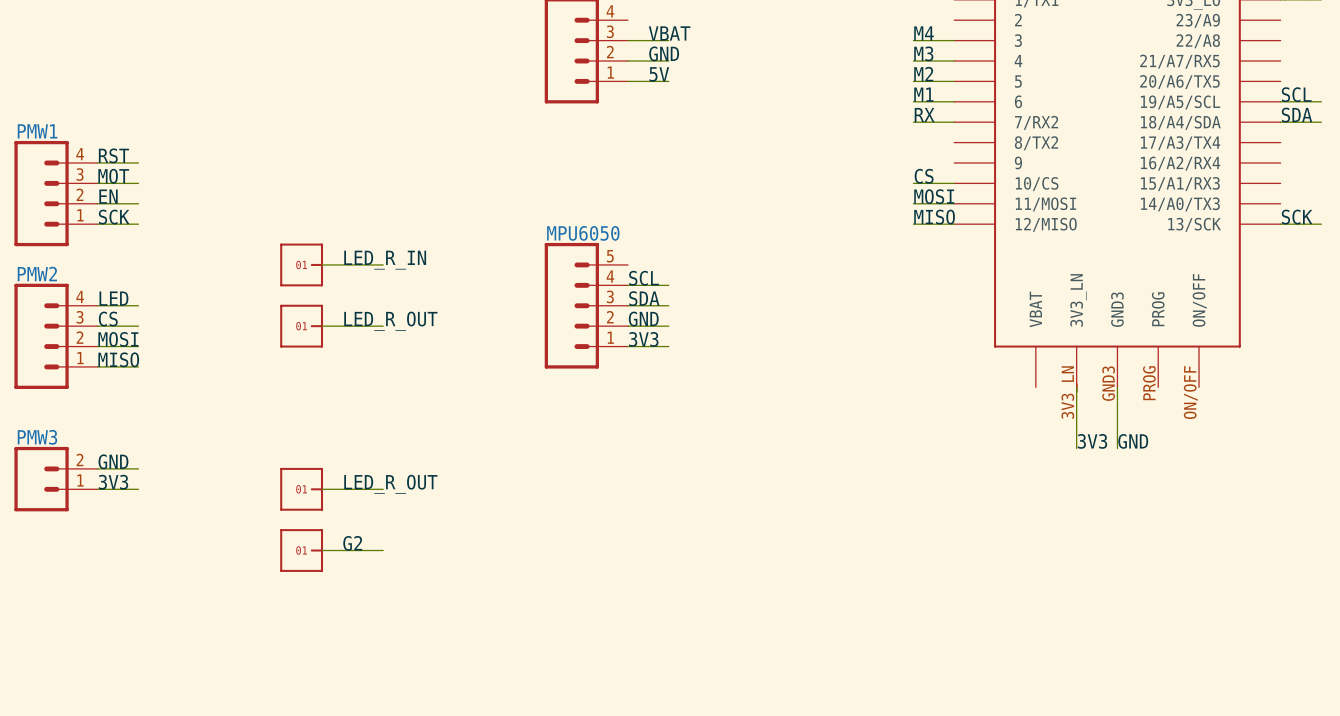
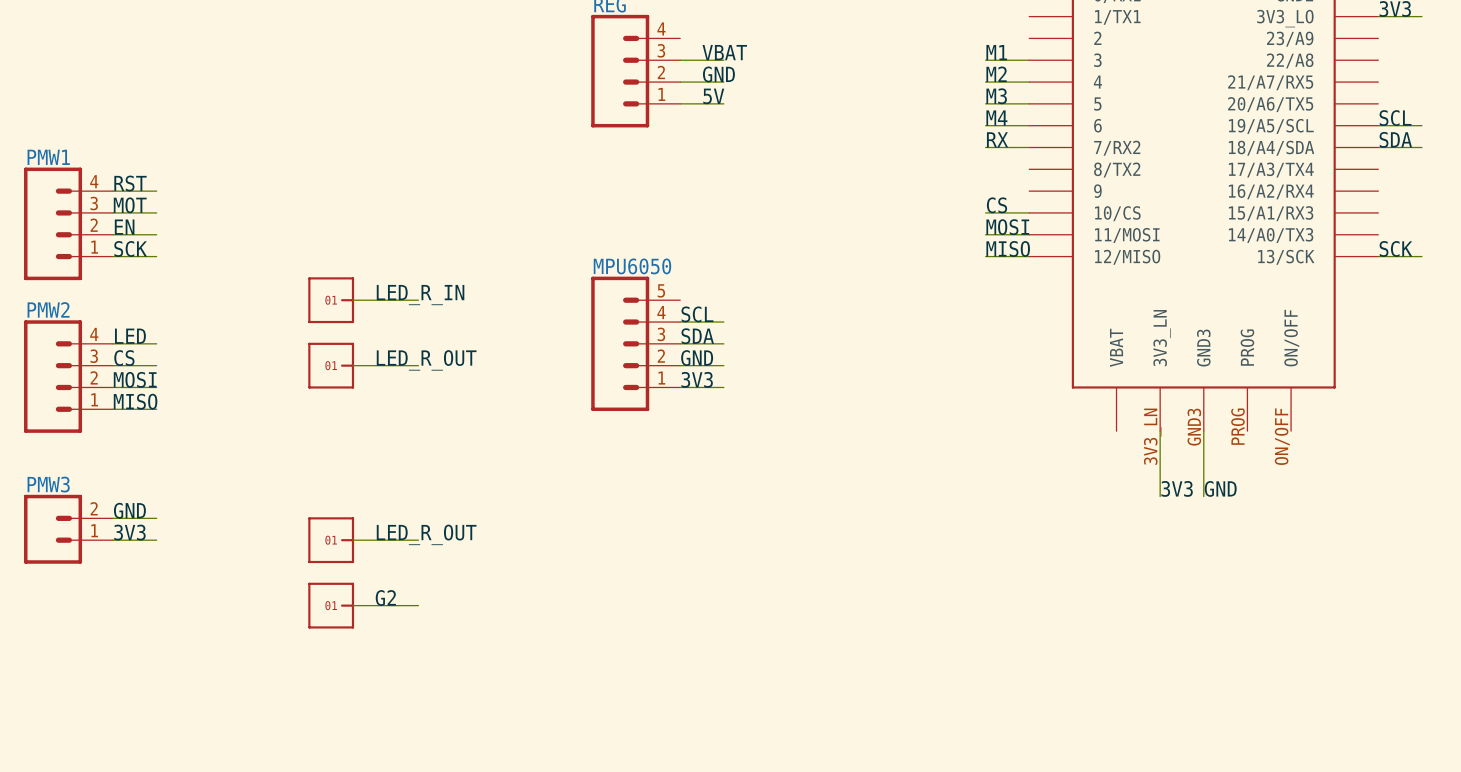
label: M4 (924, 33) -> M1 (996, 52)
label: M3 (923, 53) -> M2 (996, 74)
label: M2 (923, 74) -> M3 (996, 96)
label: M1 (923, 94) -> M4 (996, 118)

